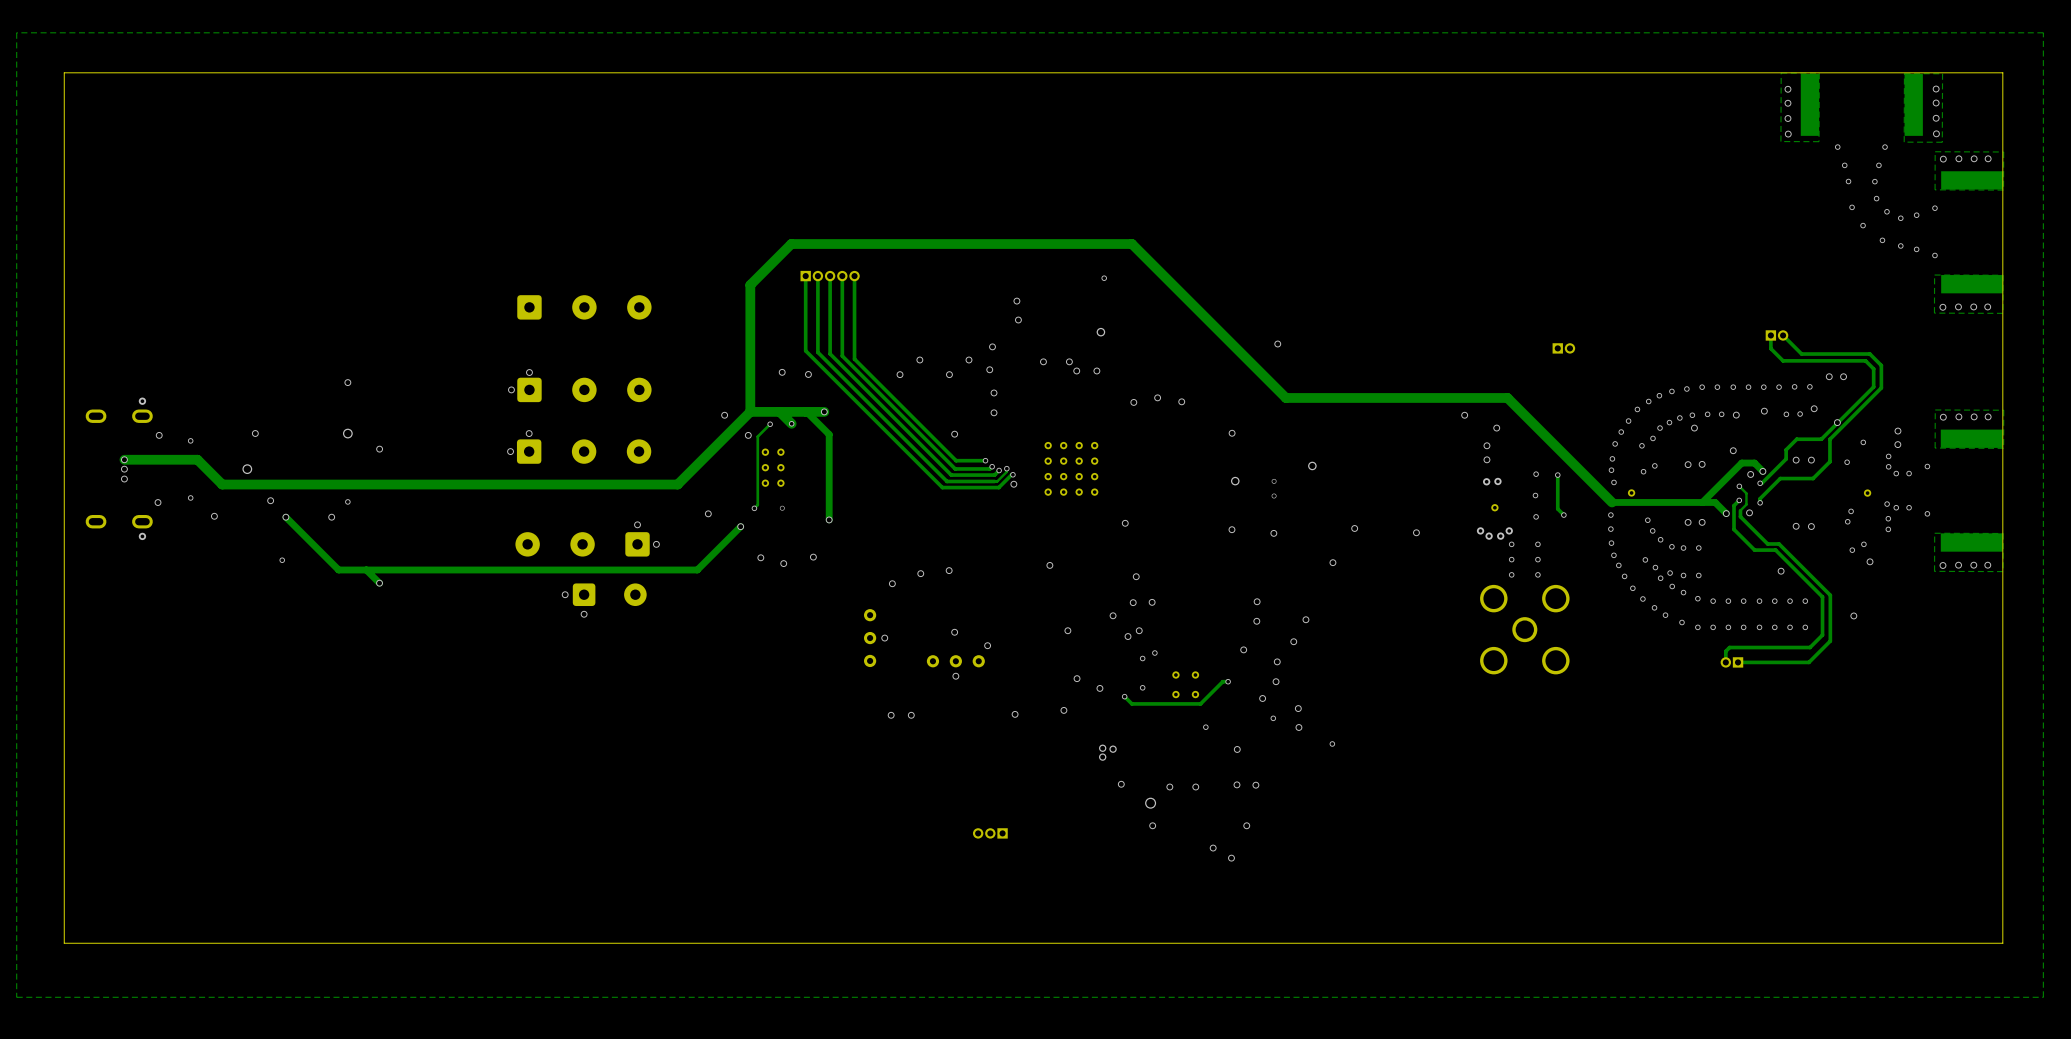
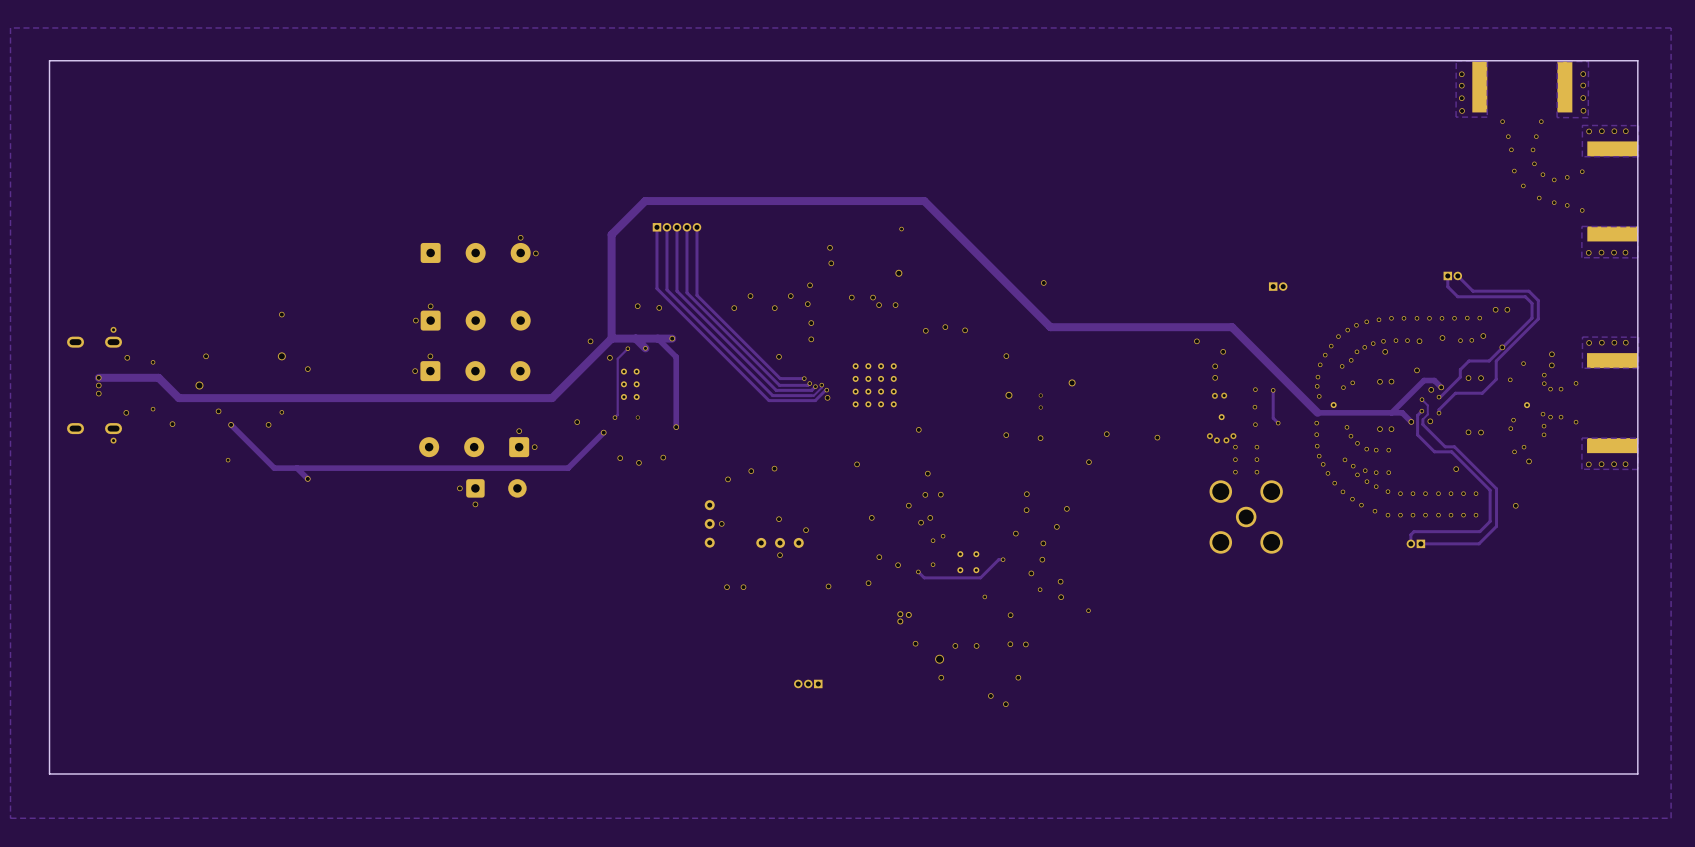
via: none -> (520, 237)
via: none -> (535, 253)

